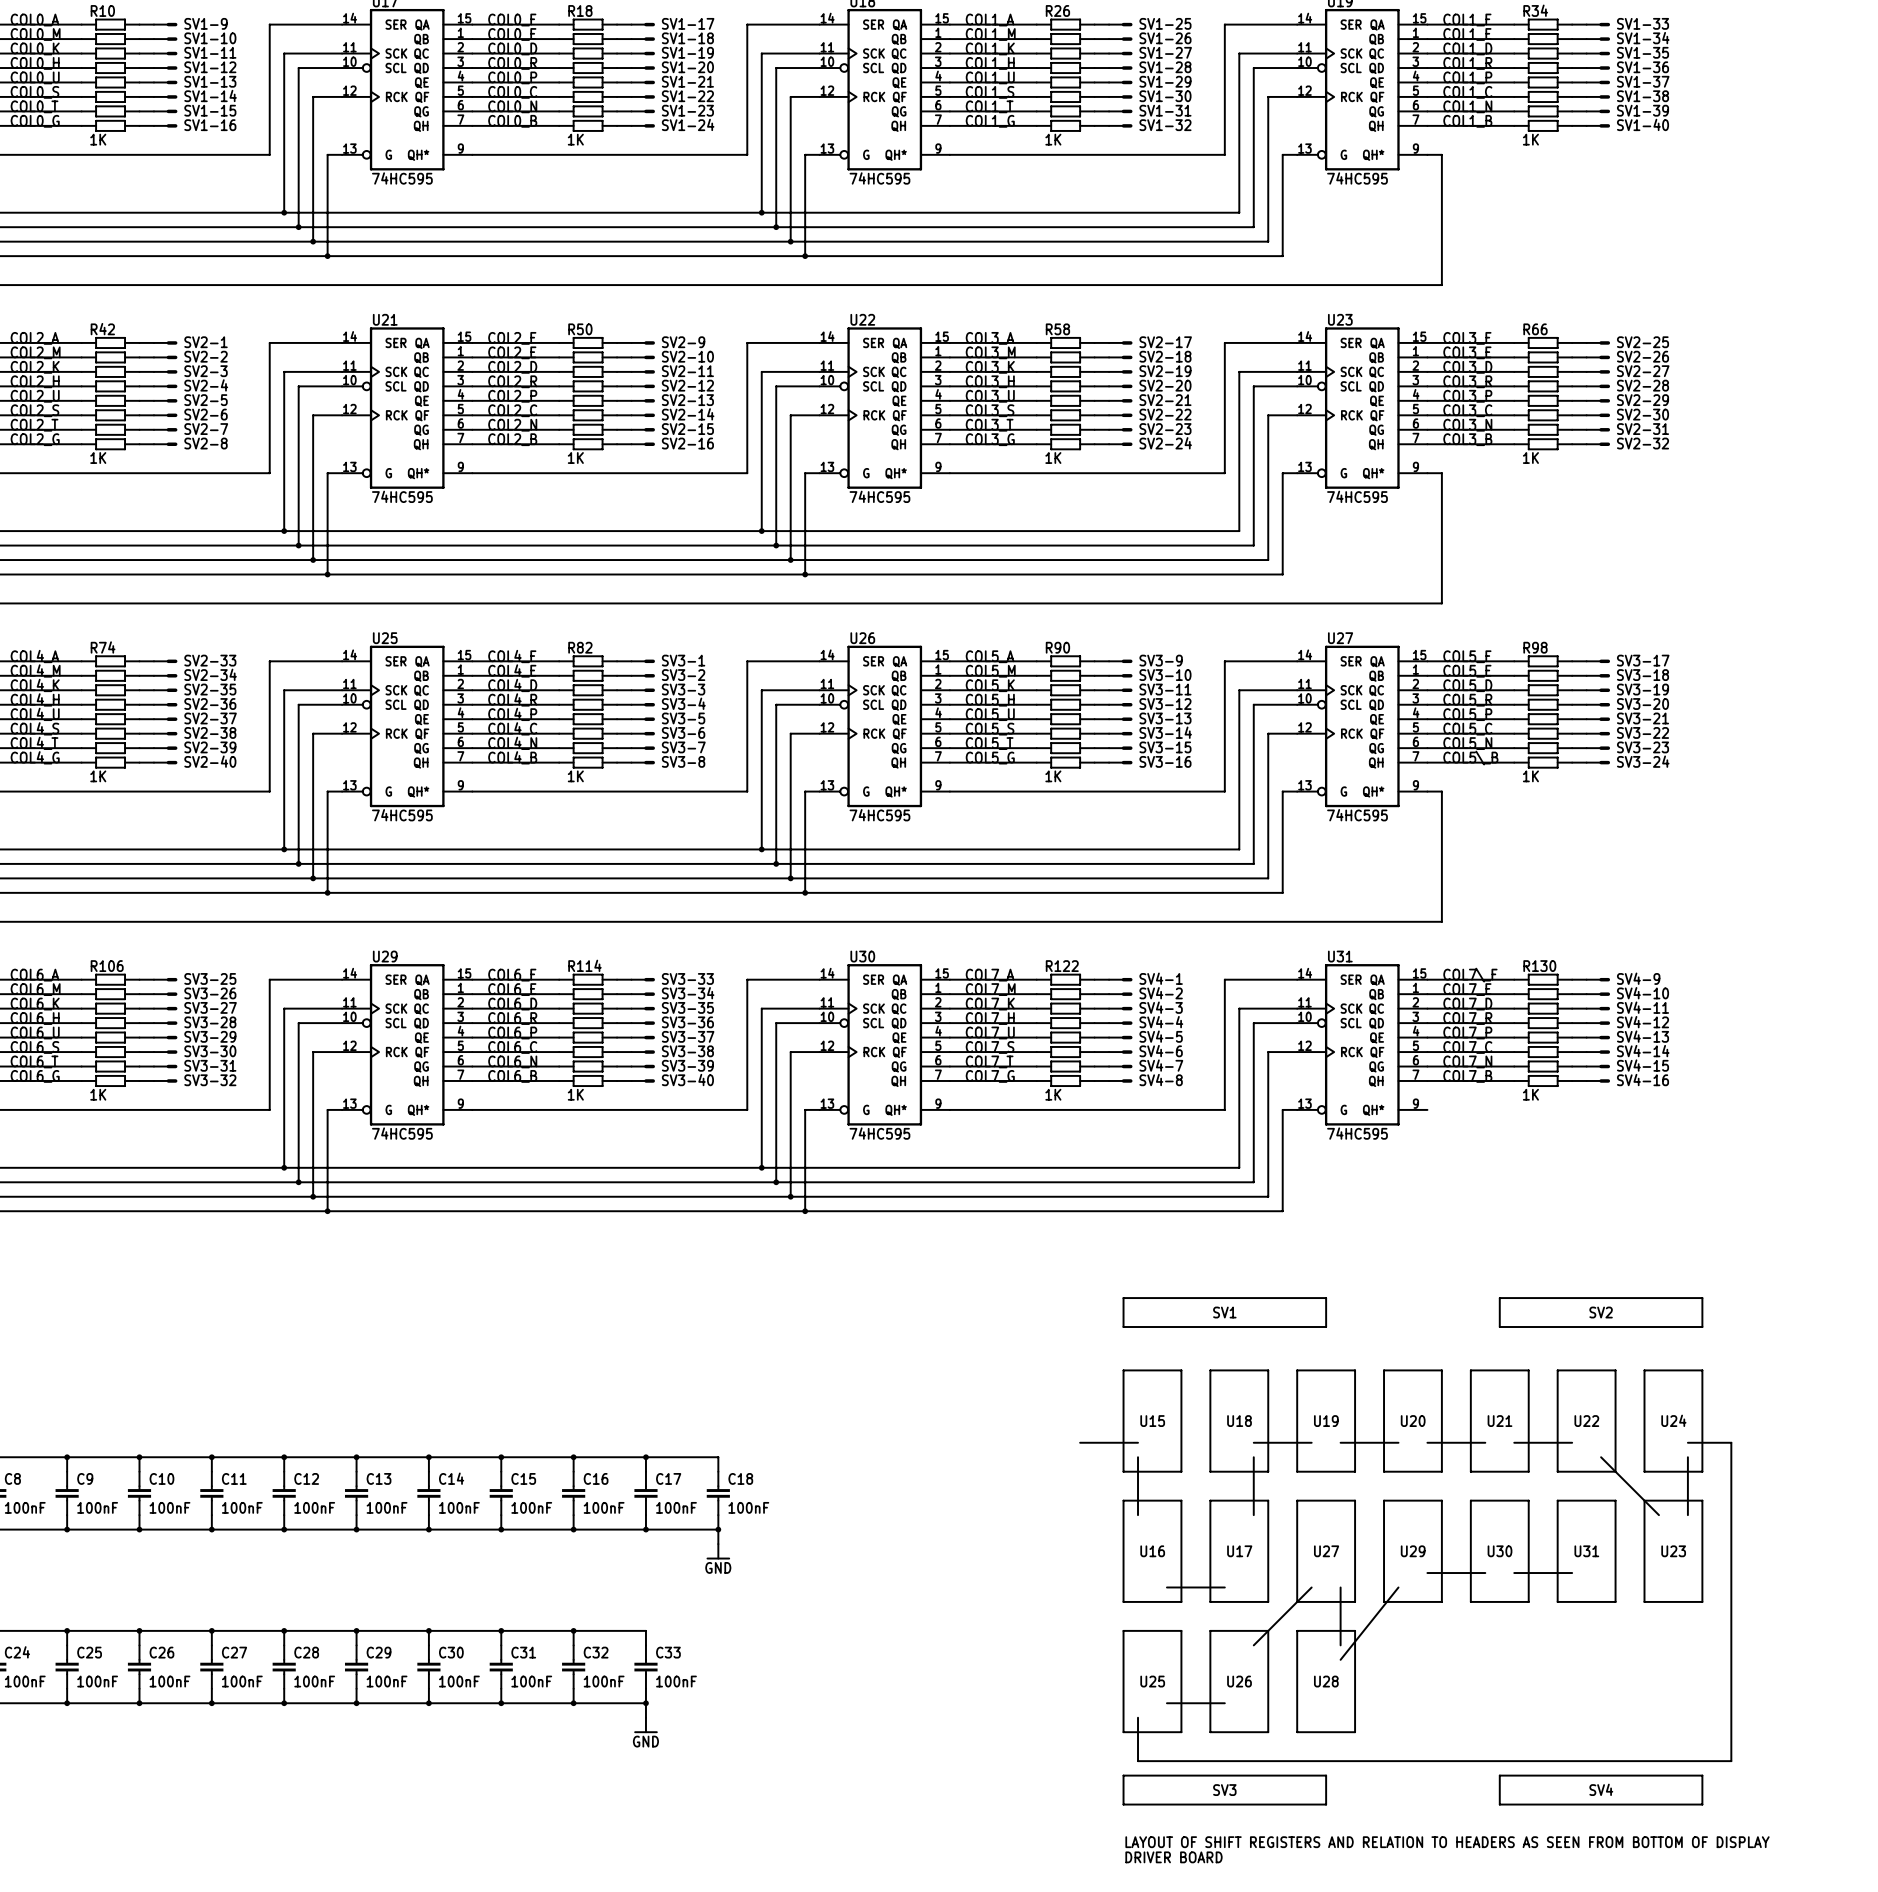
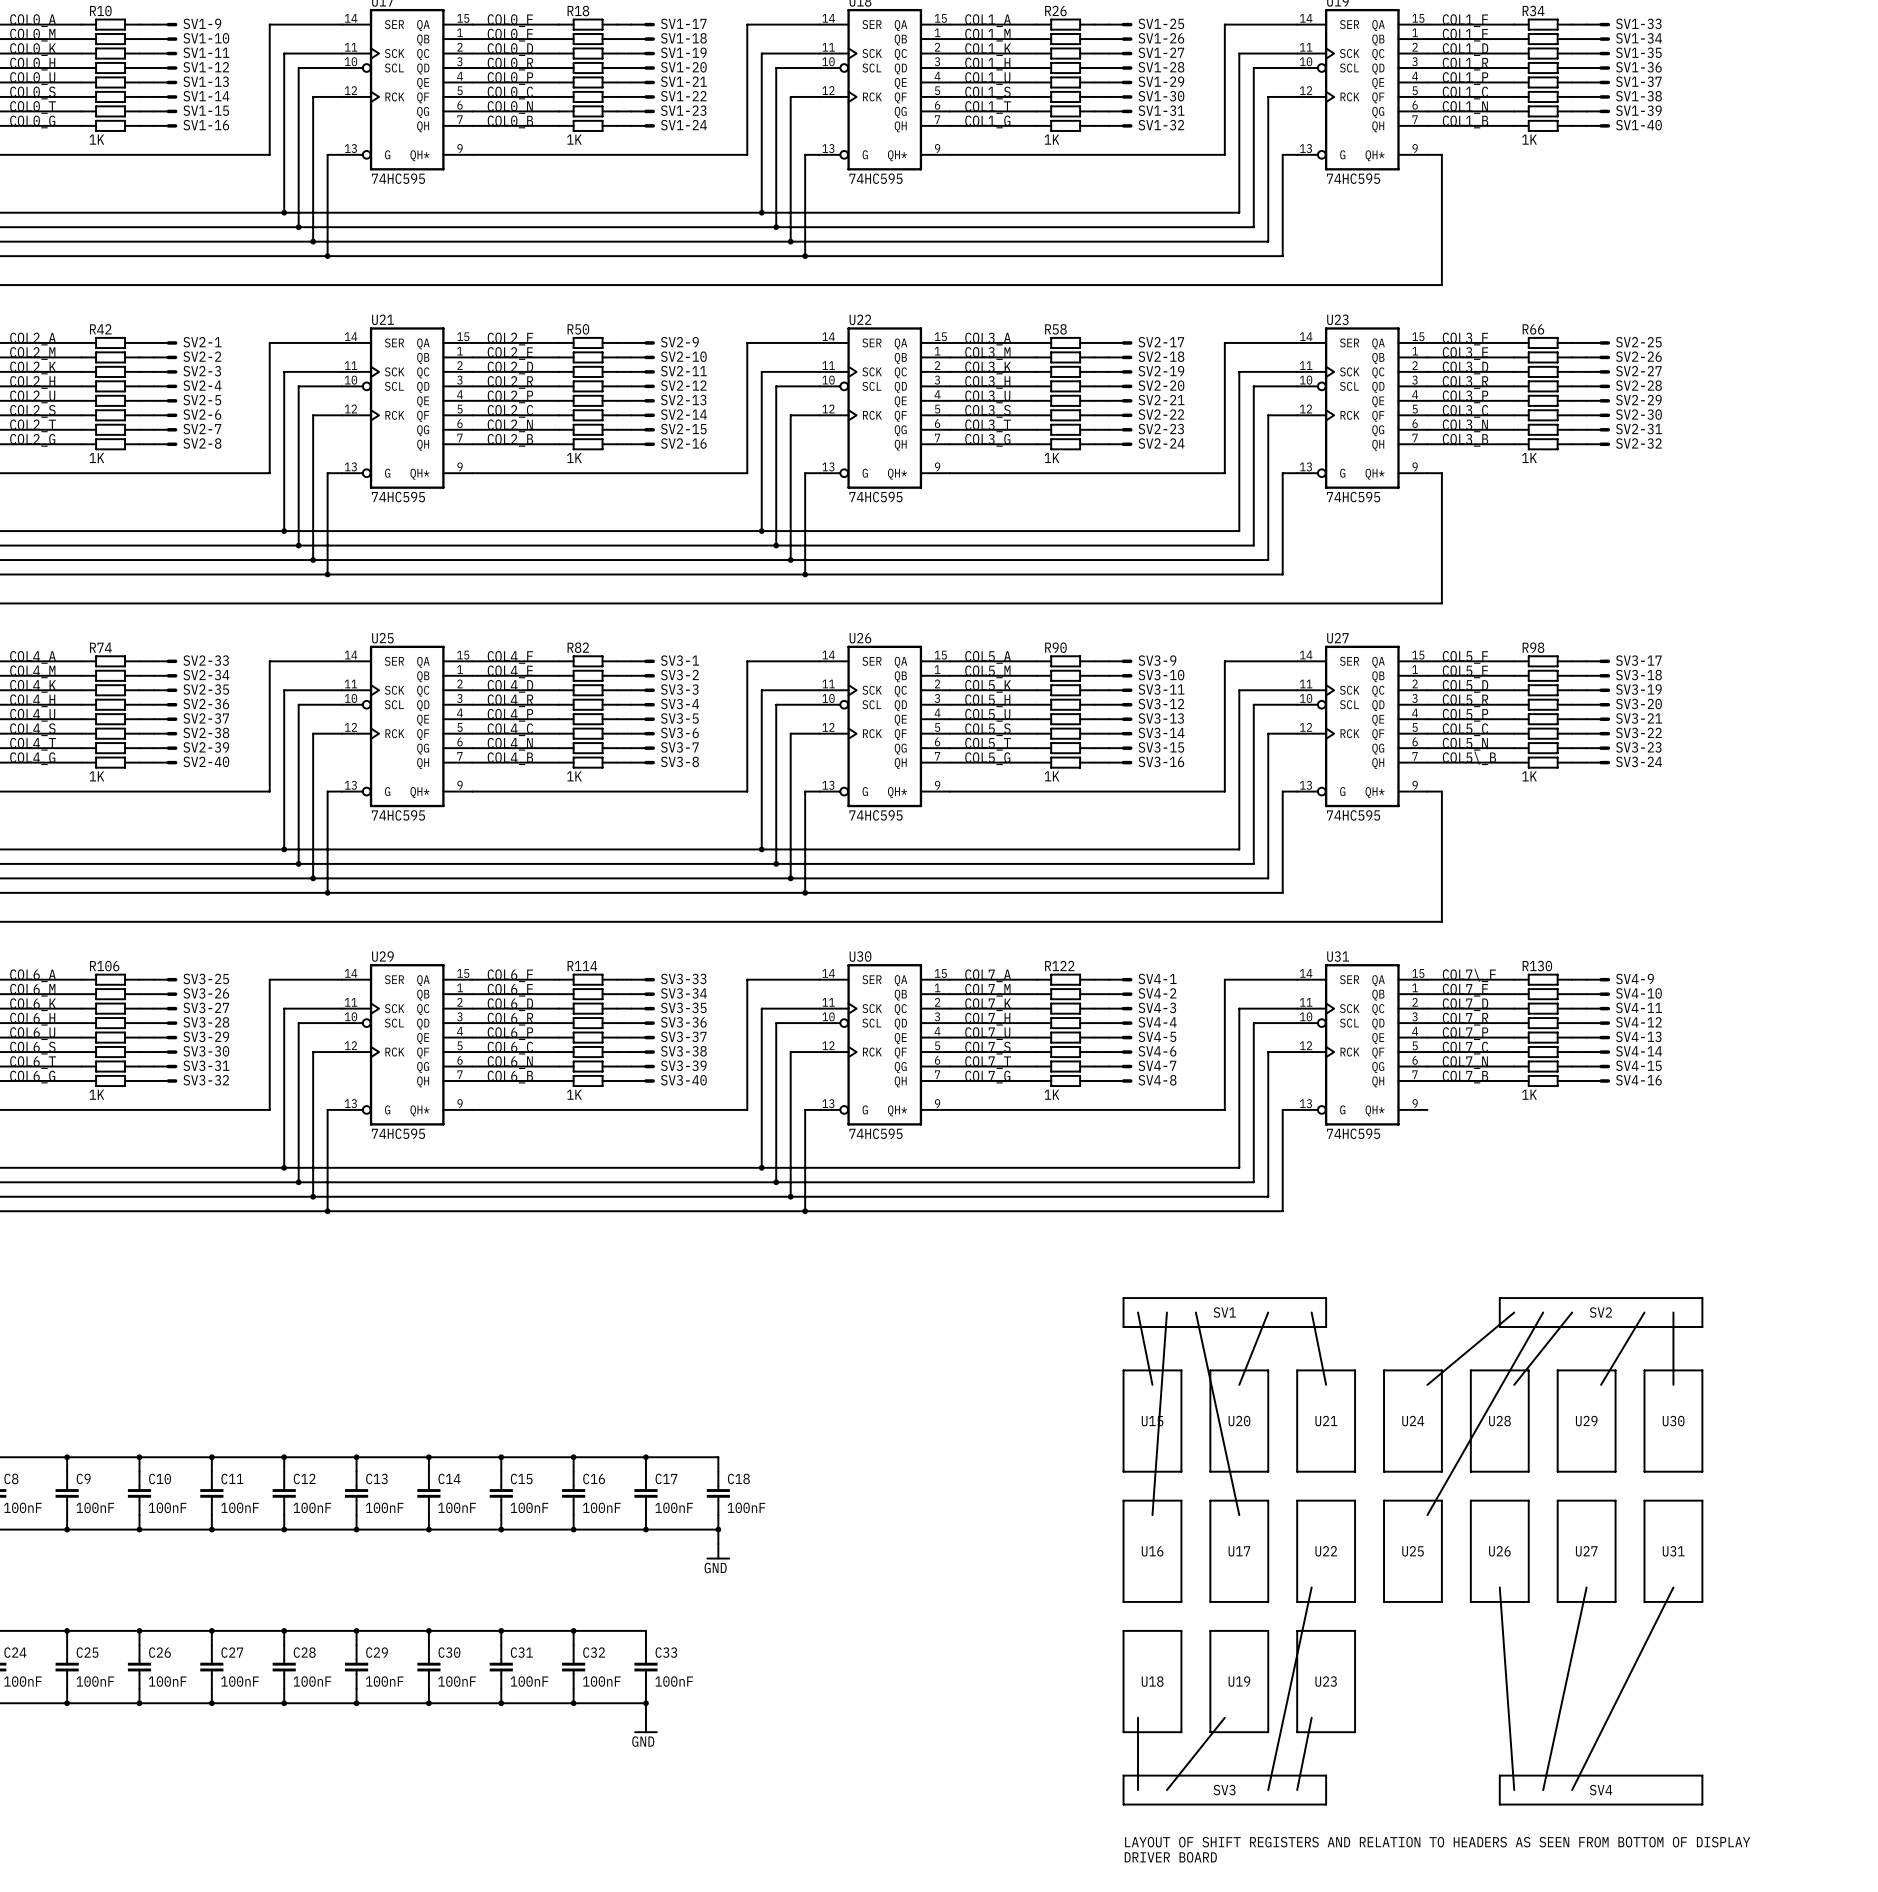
line: none -> (1138, 1312) (1152, 1384)
line: none -> (1166, 1312) (1152, 1515)
line: none -> (1195, 1312) (1239, 1515)
line: none -> (1268, 1312) (1239, 1384)
line: none -> (1311, 1312) (1326, 1384)
line: none -> (1514, 1312) (1427, 1384)
line: none -> (1543, 1312) (1427, 1515)
line: none -> (1572, 1312) (1514, 1384)
line: none -> (1644, 1312) (1601, 1384)
line: none -> (1673, 1312) (1673, 1384)
text: U24 (1673, 1420) -> U30 (1673, 1421)
text: U18 (1239, 1421) -> U20 (1239, 1421)
text: U19 (1326, 1421) -> U21 (1326, 1421)
text: U20 (1413, 1421) -> U24 (1413, 1421)
text: U21 (1500, 1421) -> U28 (1499, 1421)
text: U22 (1586, 1421) -> U29 (1586, 1421)
line: (1080, 1442) (1138, 1442) -> none
line: (1253, 1442) (1311, 1442) -> none
line: (1340, 1442) (1398, 1442) -> none
line: (1427, 1442) (1485, 1442) -> none
line: (1514, 1442) (1572, 1442) -> none
line: (1687, 1442) (1731, 1442) (1731, 1761) (1138, 1761) -> (1138, 1790) (1138, 1761)
line: (1138, 1457) (1138, 1515) -> none
line: (1253, 1457) (1253, 1515) -> none
line: (1601, 1457) (1658, 1515) -> none
line: (1687, 1457) (1687, 1515) -> none
text: U27 (1326, 1551) -> U22 (1326, 1551)
text: U29 (1413, 1551) -> U25 (1413, 1551)
text: U30 (1500, 1551) -> U26 (1499, 1551)
text: U31 (1586, 1551) -> U27 (1586, 1551)
text: U23 (1673, 1551) -> U31 (1673, 1551)
line: (1427, 1573) (1485, 1573) -> none
line: (1514, 1573) (1572, 1573) -> none
line: (1166, 1587) (1224, 1587) -> none
line: (1311, 1587) (1253, 1645) -> (1311, 1587) (1268, 1790)
line: (1340, 1587) (1340, 1645) -> none
line: (1398, 1587) (1340, 1659) -> none
line: none -> (1499, 1587) (1514, 1790)
line: none -> (1586, 1587) (1543, 1790)
line: none -> (1673, 1587) (1572, 1790)
text: U25 (1152, 1681) -> U18 (1152, 1681)
text: U26 (1239, 1681) -> U19 (1239, 1681)
text: U28 (1326, 1681) -> U23 (1326, 1681)
line: (1166, 1703) (1224, 1703) -> none
line: none -> (1224, 1717) (1166, 1790)
line: none -> (1311, 1717) (1297, 1790)

